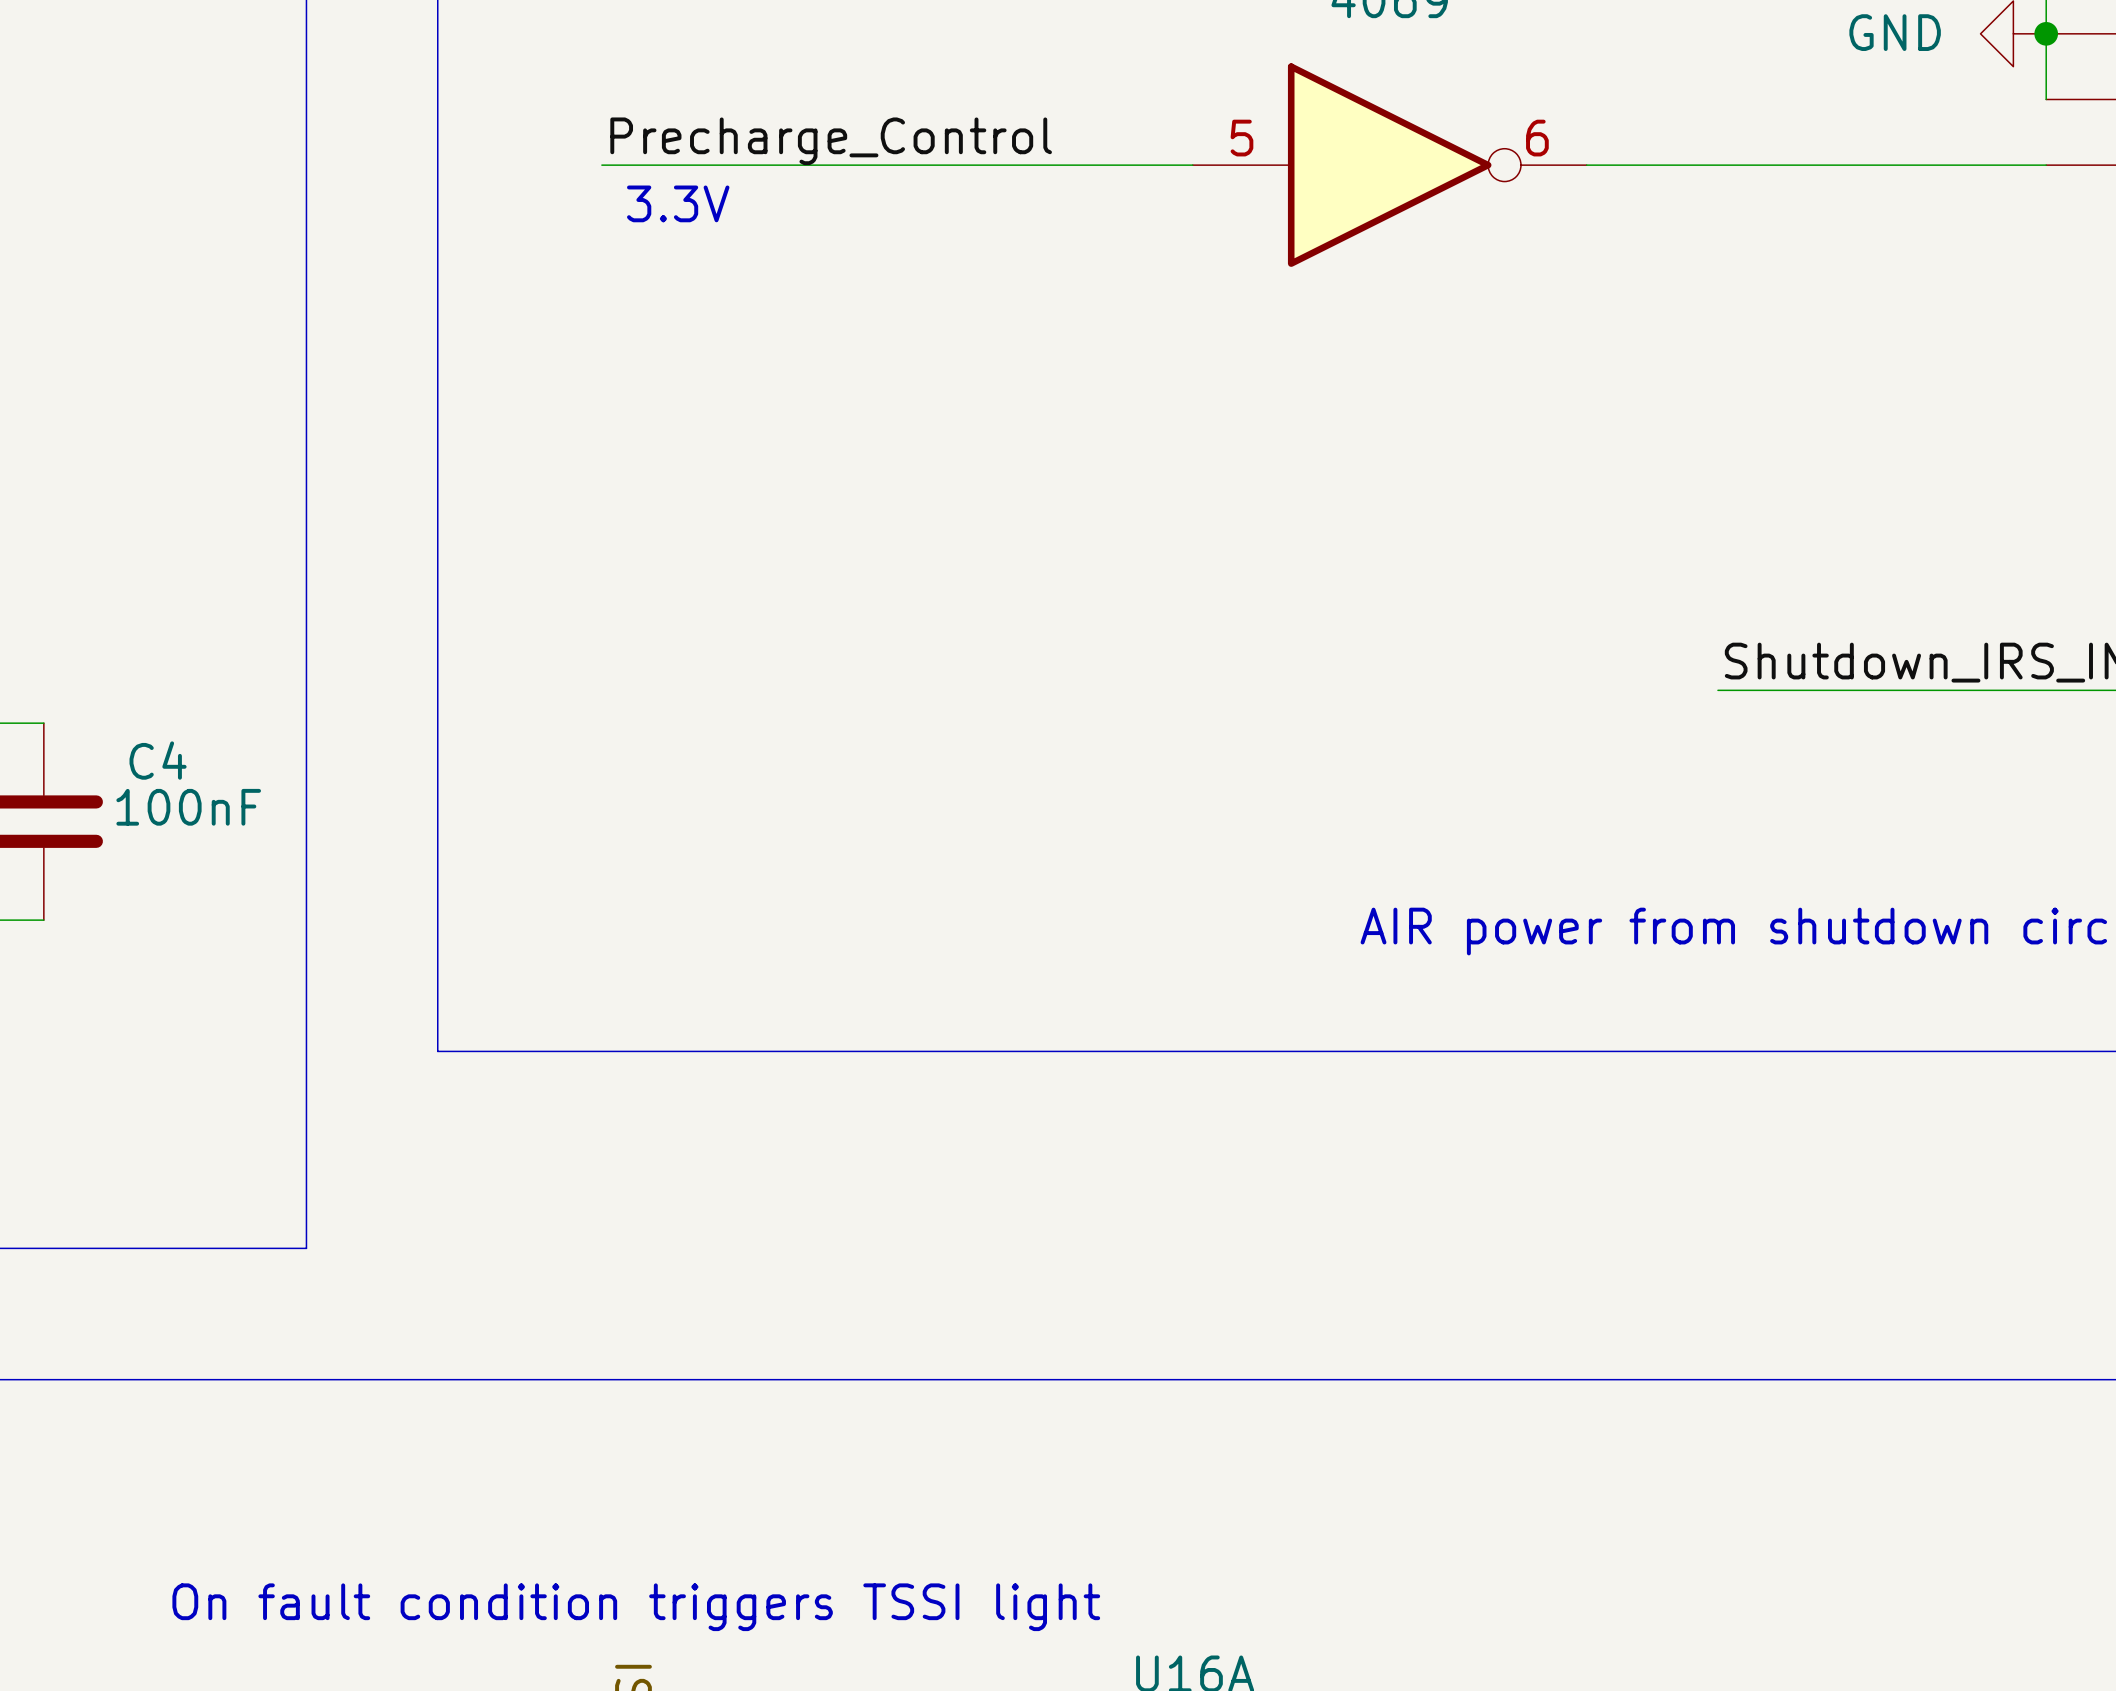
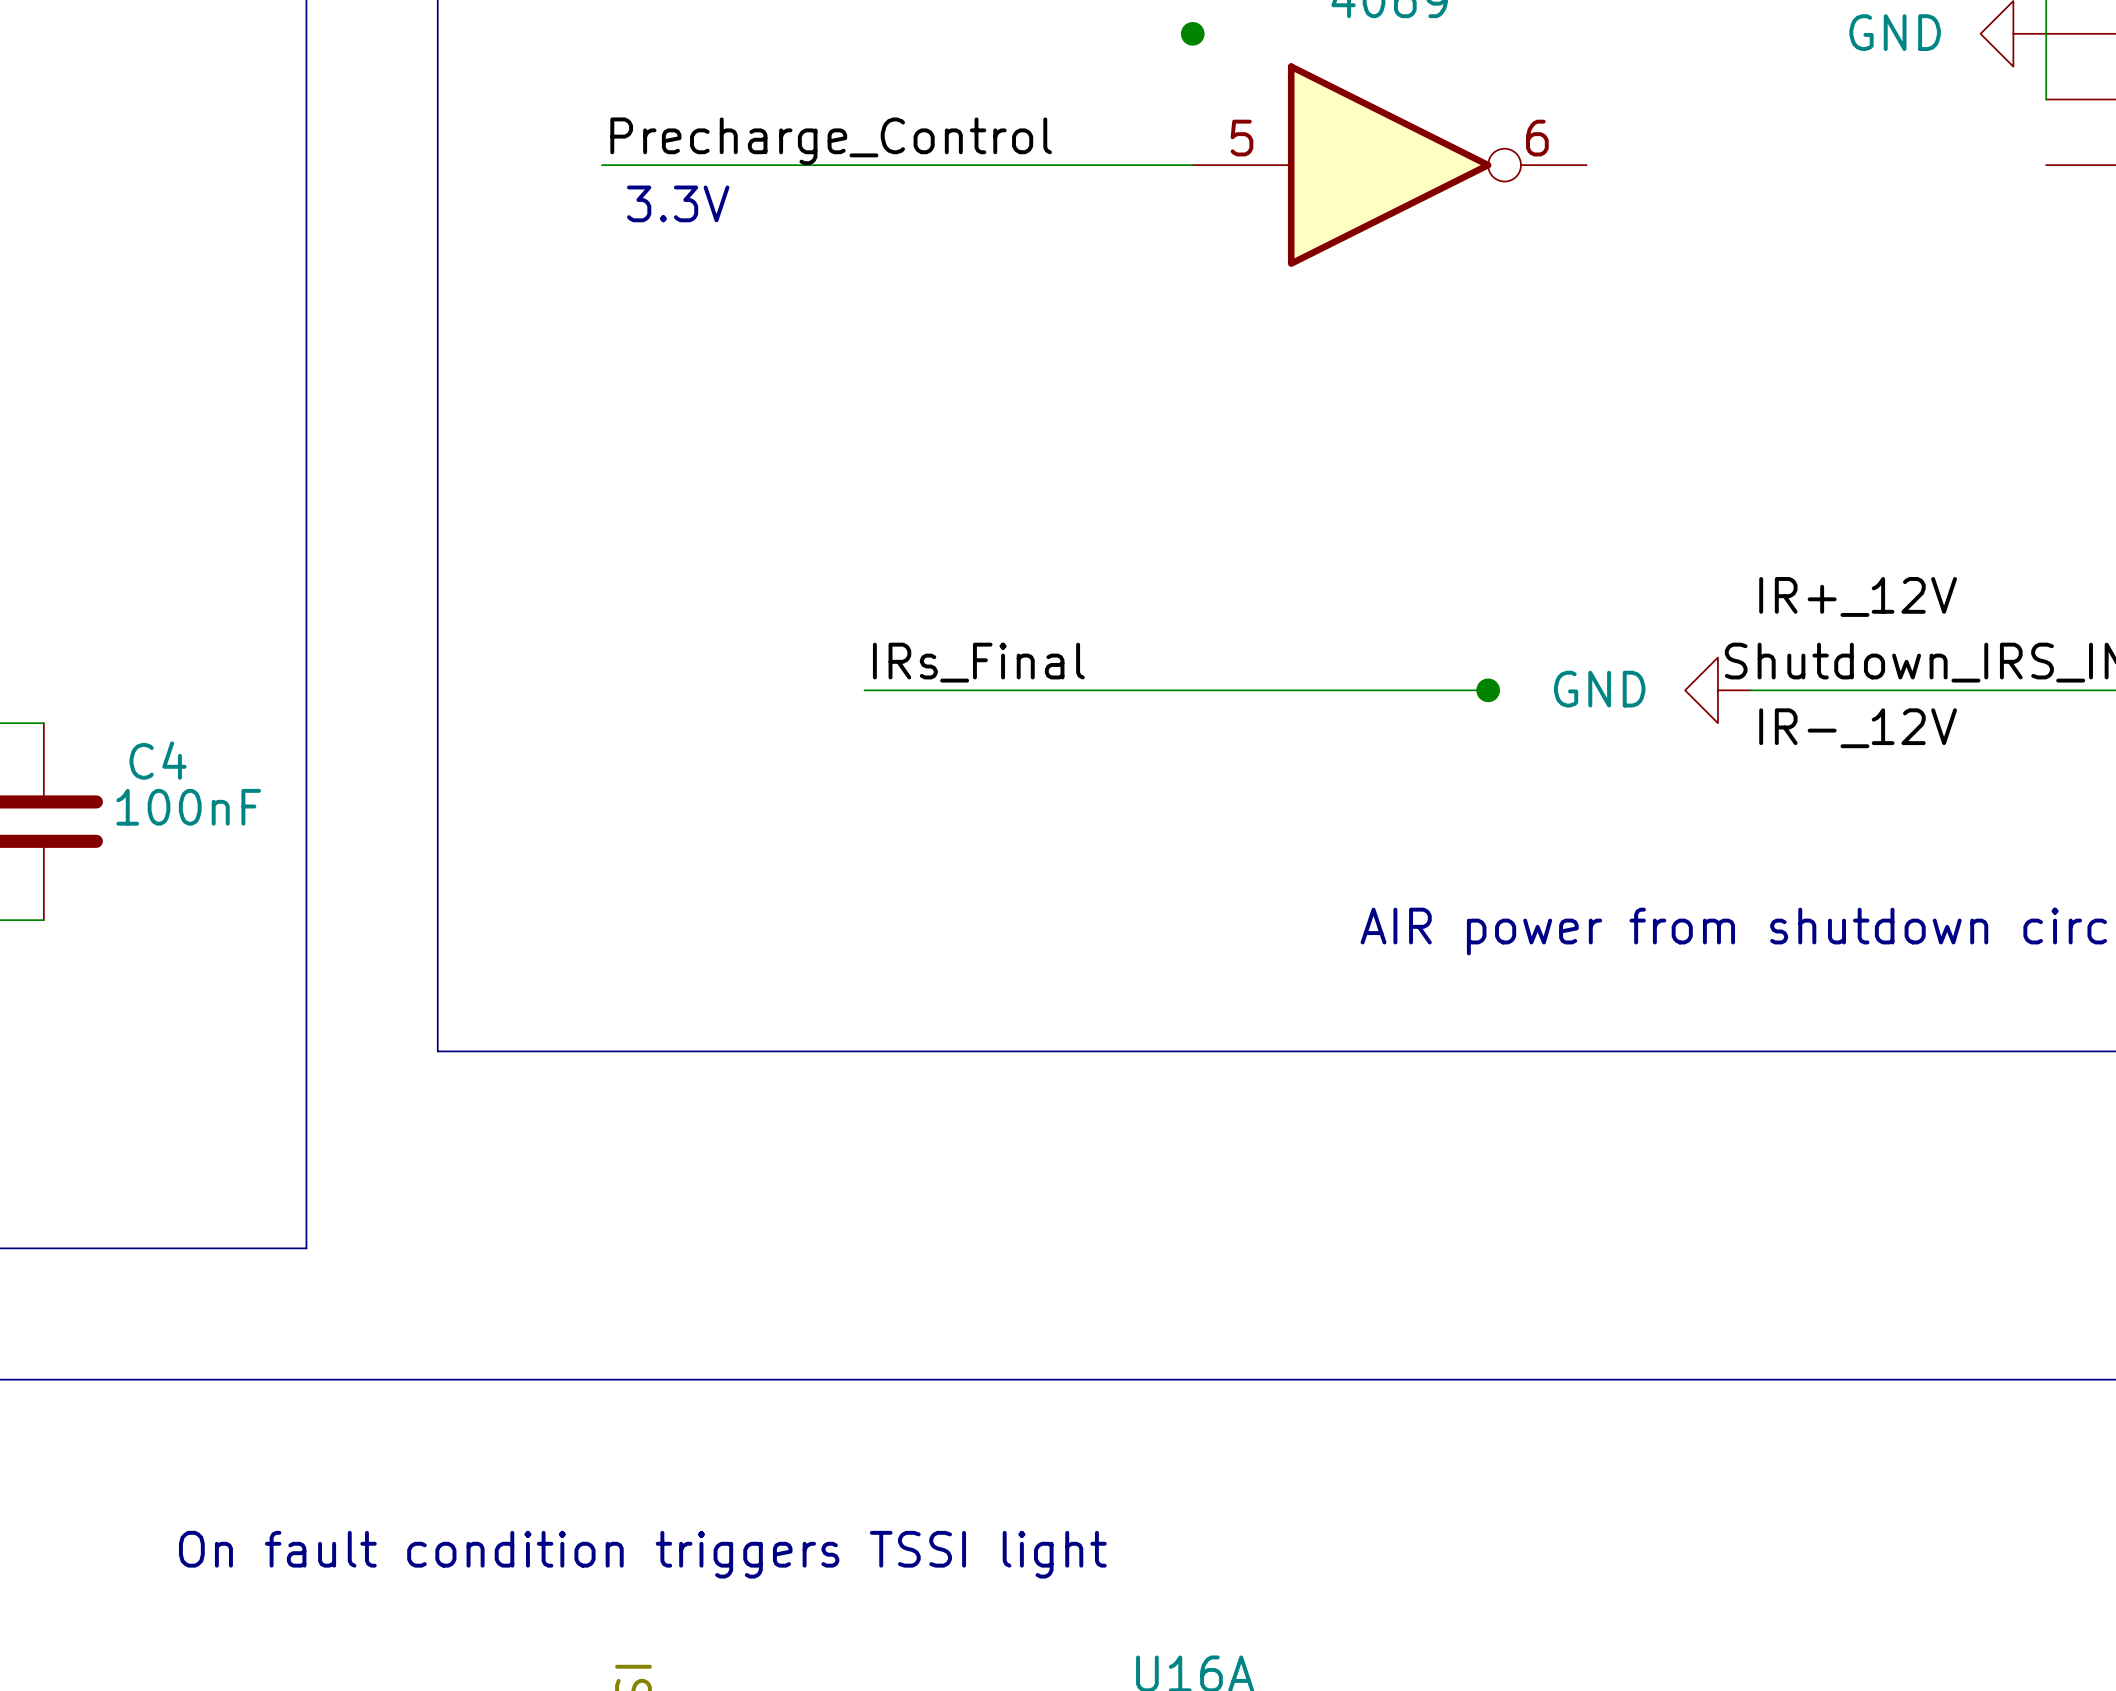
junction: none -> (1192, 33)
junction: (2046, 33) -> none
wire: (1586, 165) (2046, 165) -> none
label: none -> IR+_12V (1858, 596)
label: none -> IRs_Final (978, 662)
wire: none -> (864, 690) (1488, 690)
junction: none -> (1488, 690)
power symbol: none -> GND (1717, 690)
label: none -> IR-_12V (1858, 728)
text position: On fault condition triggers TSSI light (636, 1607) -> On fault condition triggers TSSI light (642, 1554)

